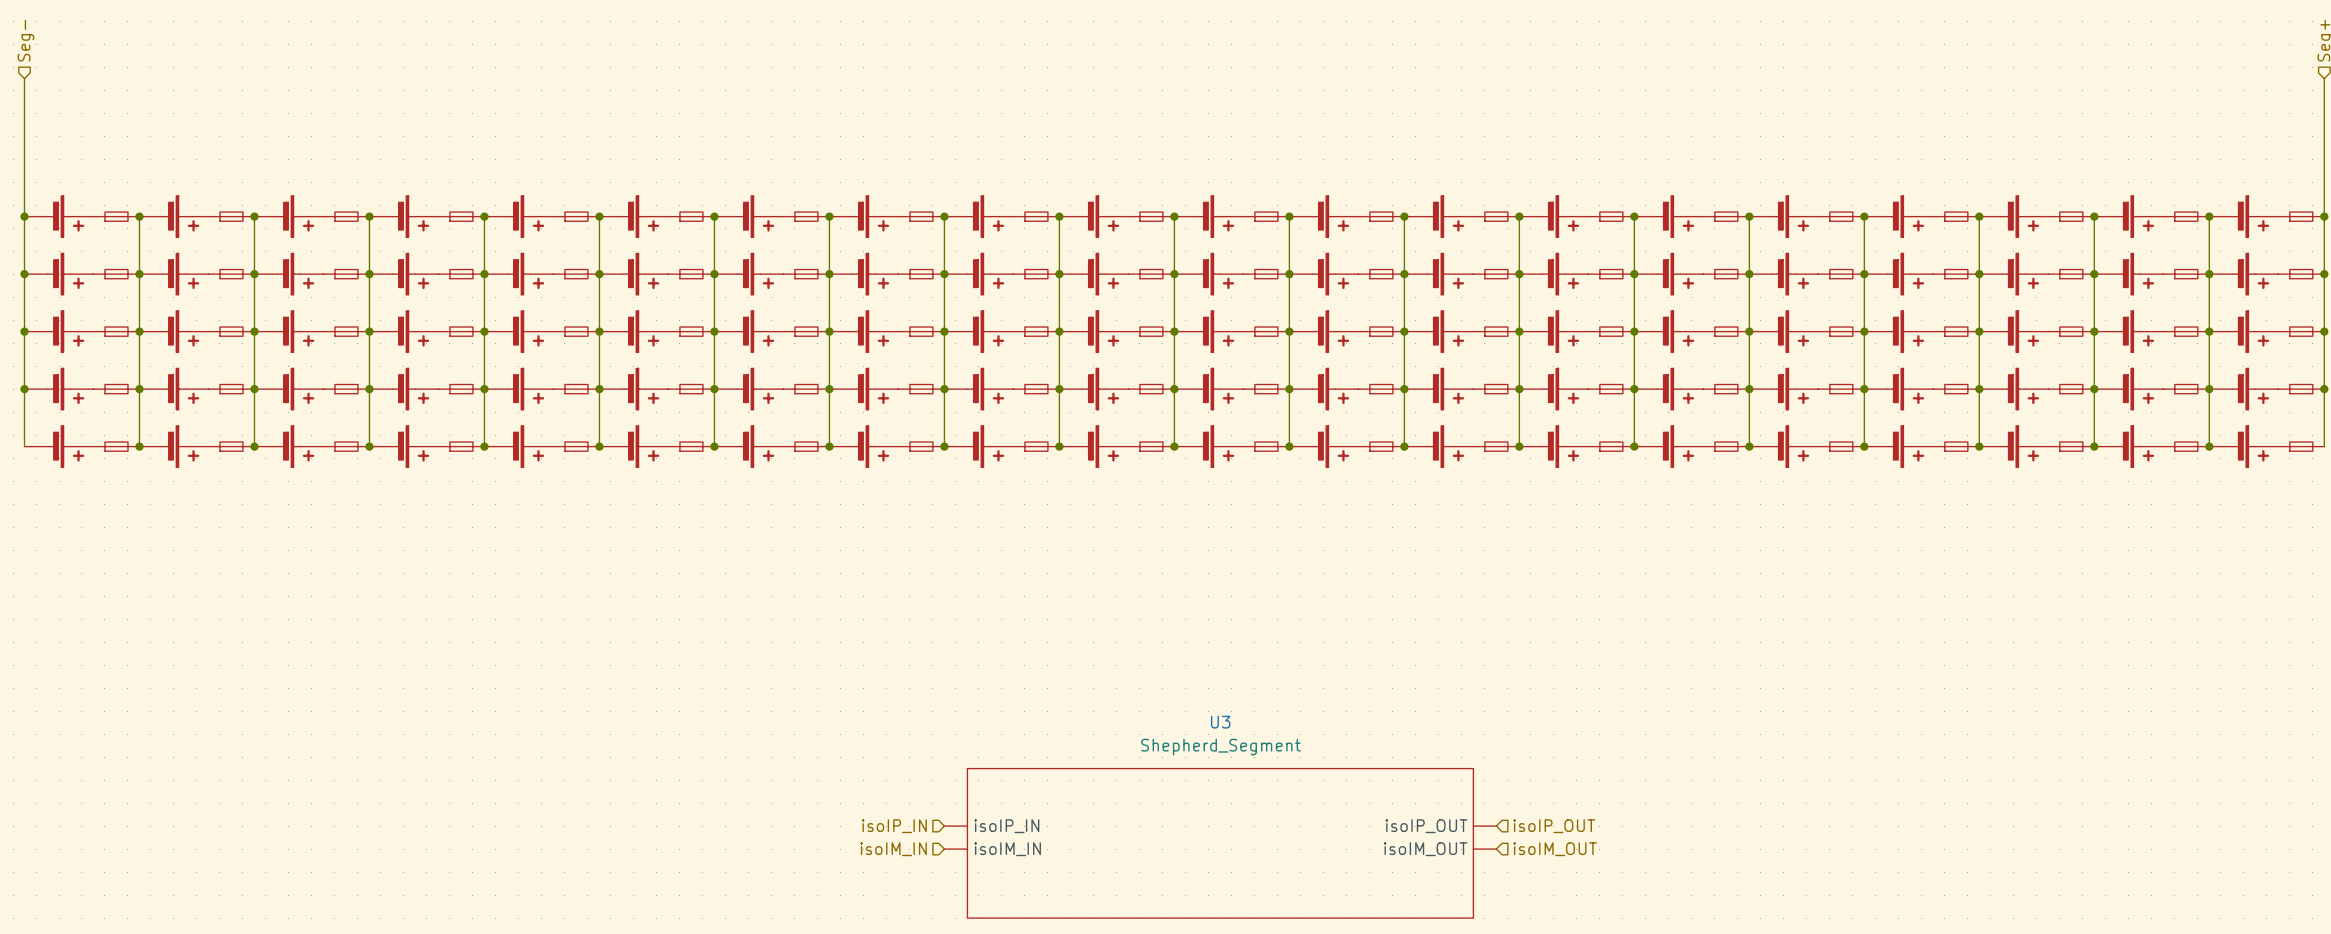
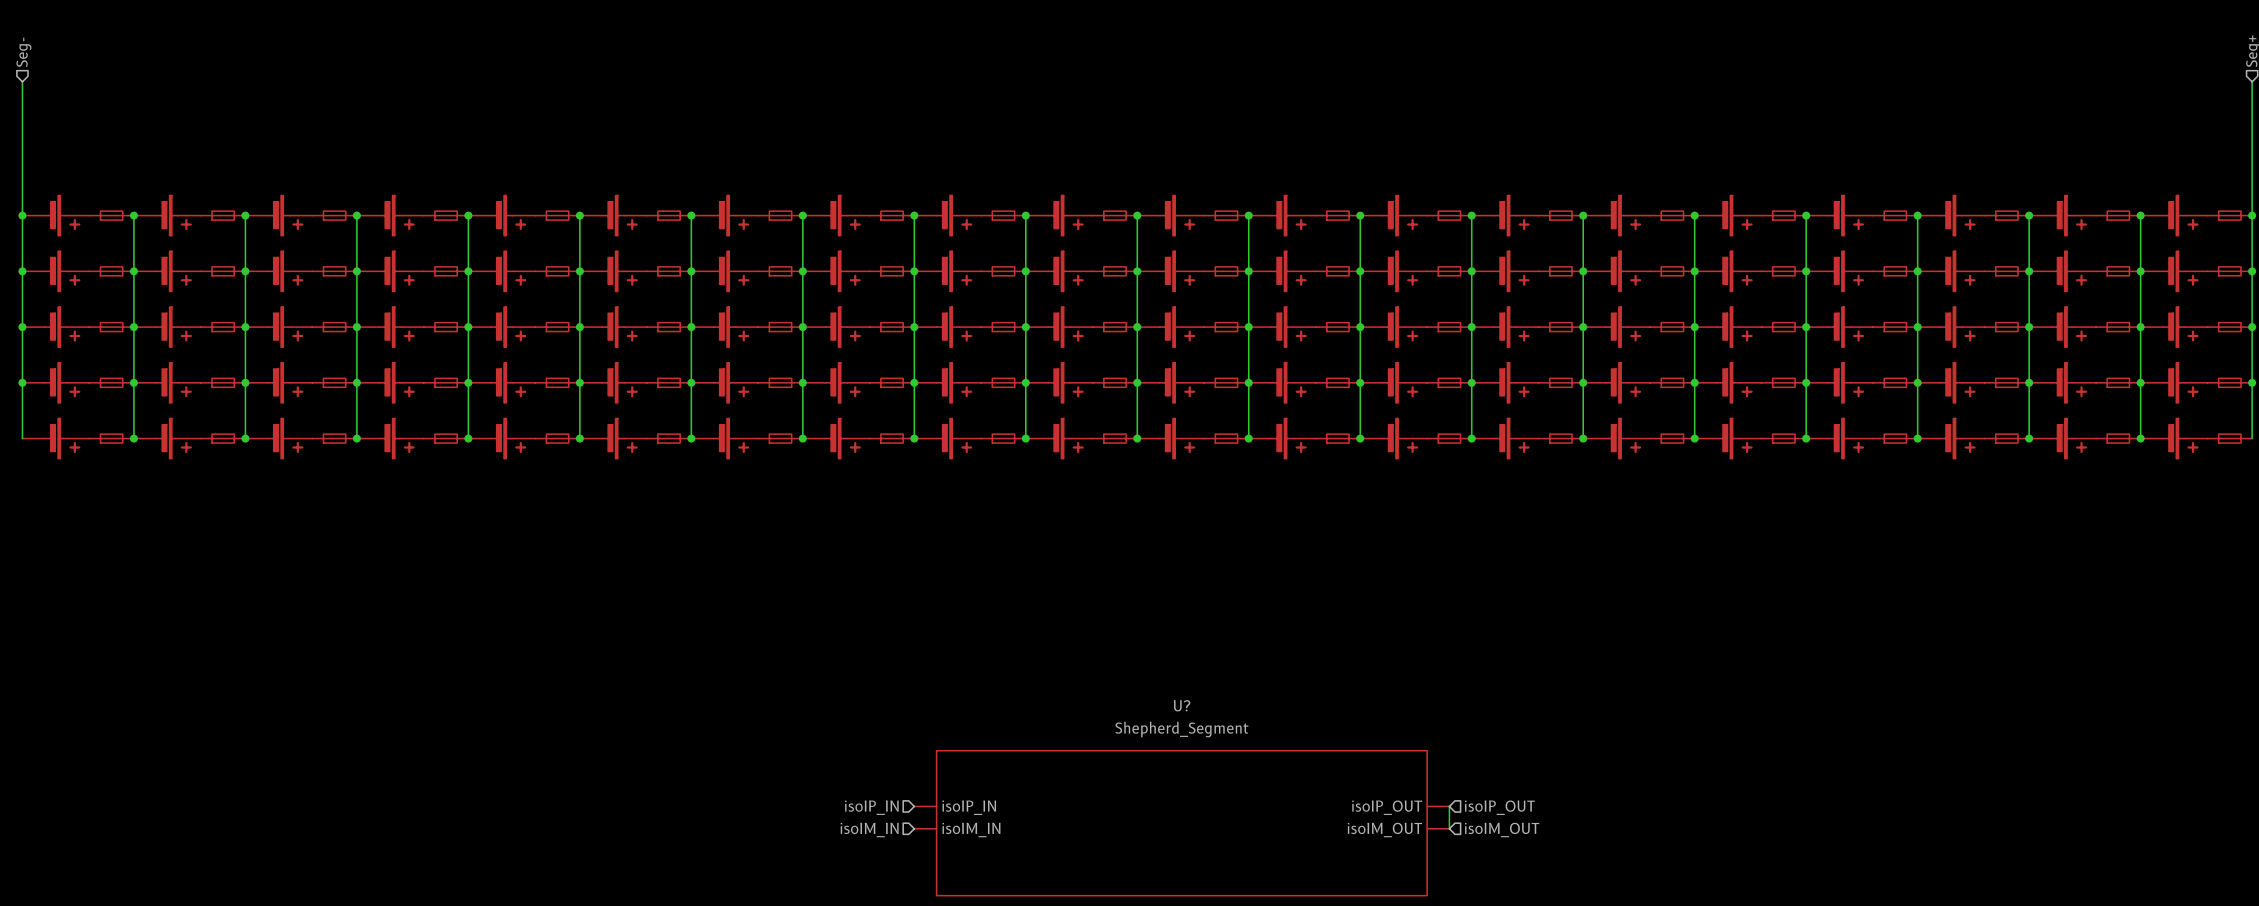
U3 name: U3 (1220, 722) -> U? (1182, 705)
wire: none -> (1449, 806) (1449, 828)

